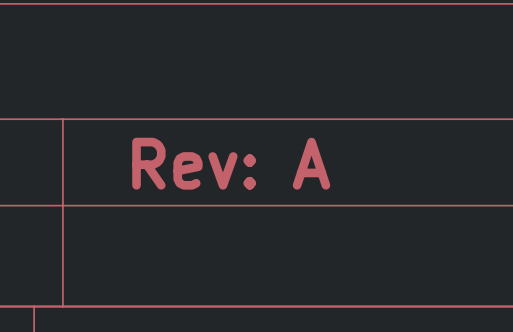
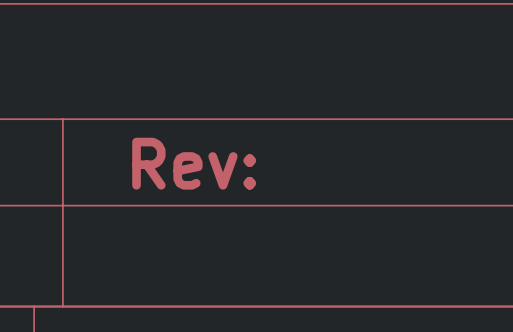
title block: Rev: A (231, 163) -> Rev: (194, 163)

